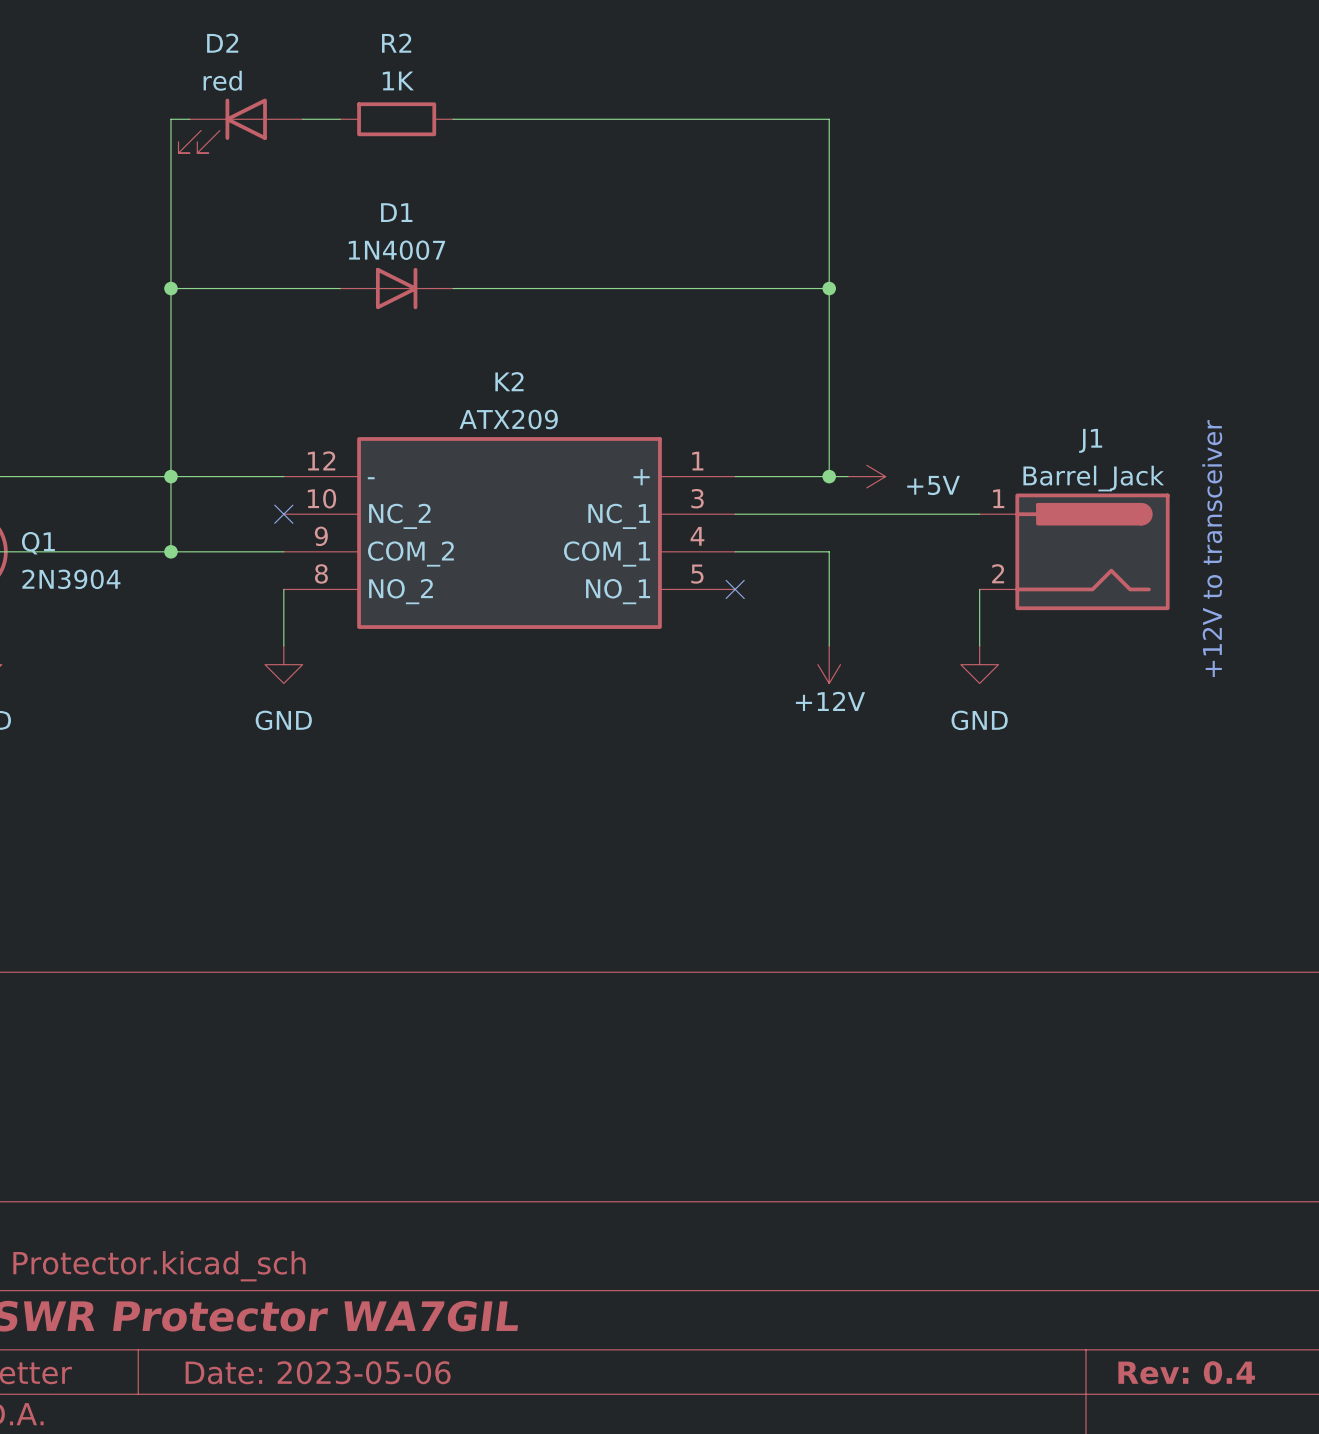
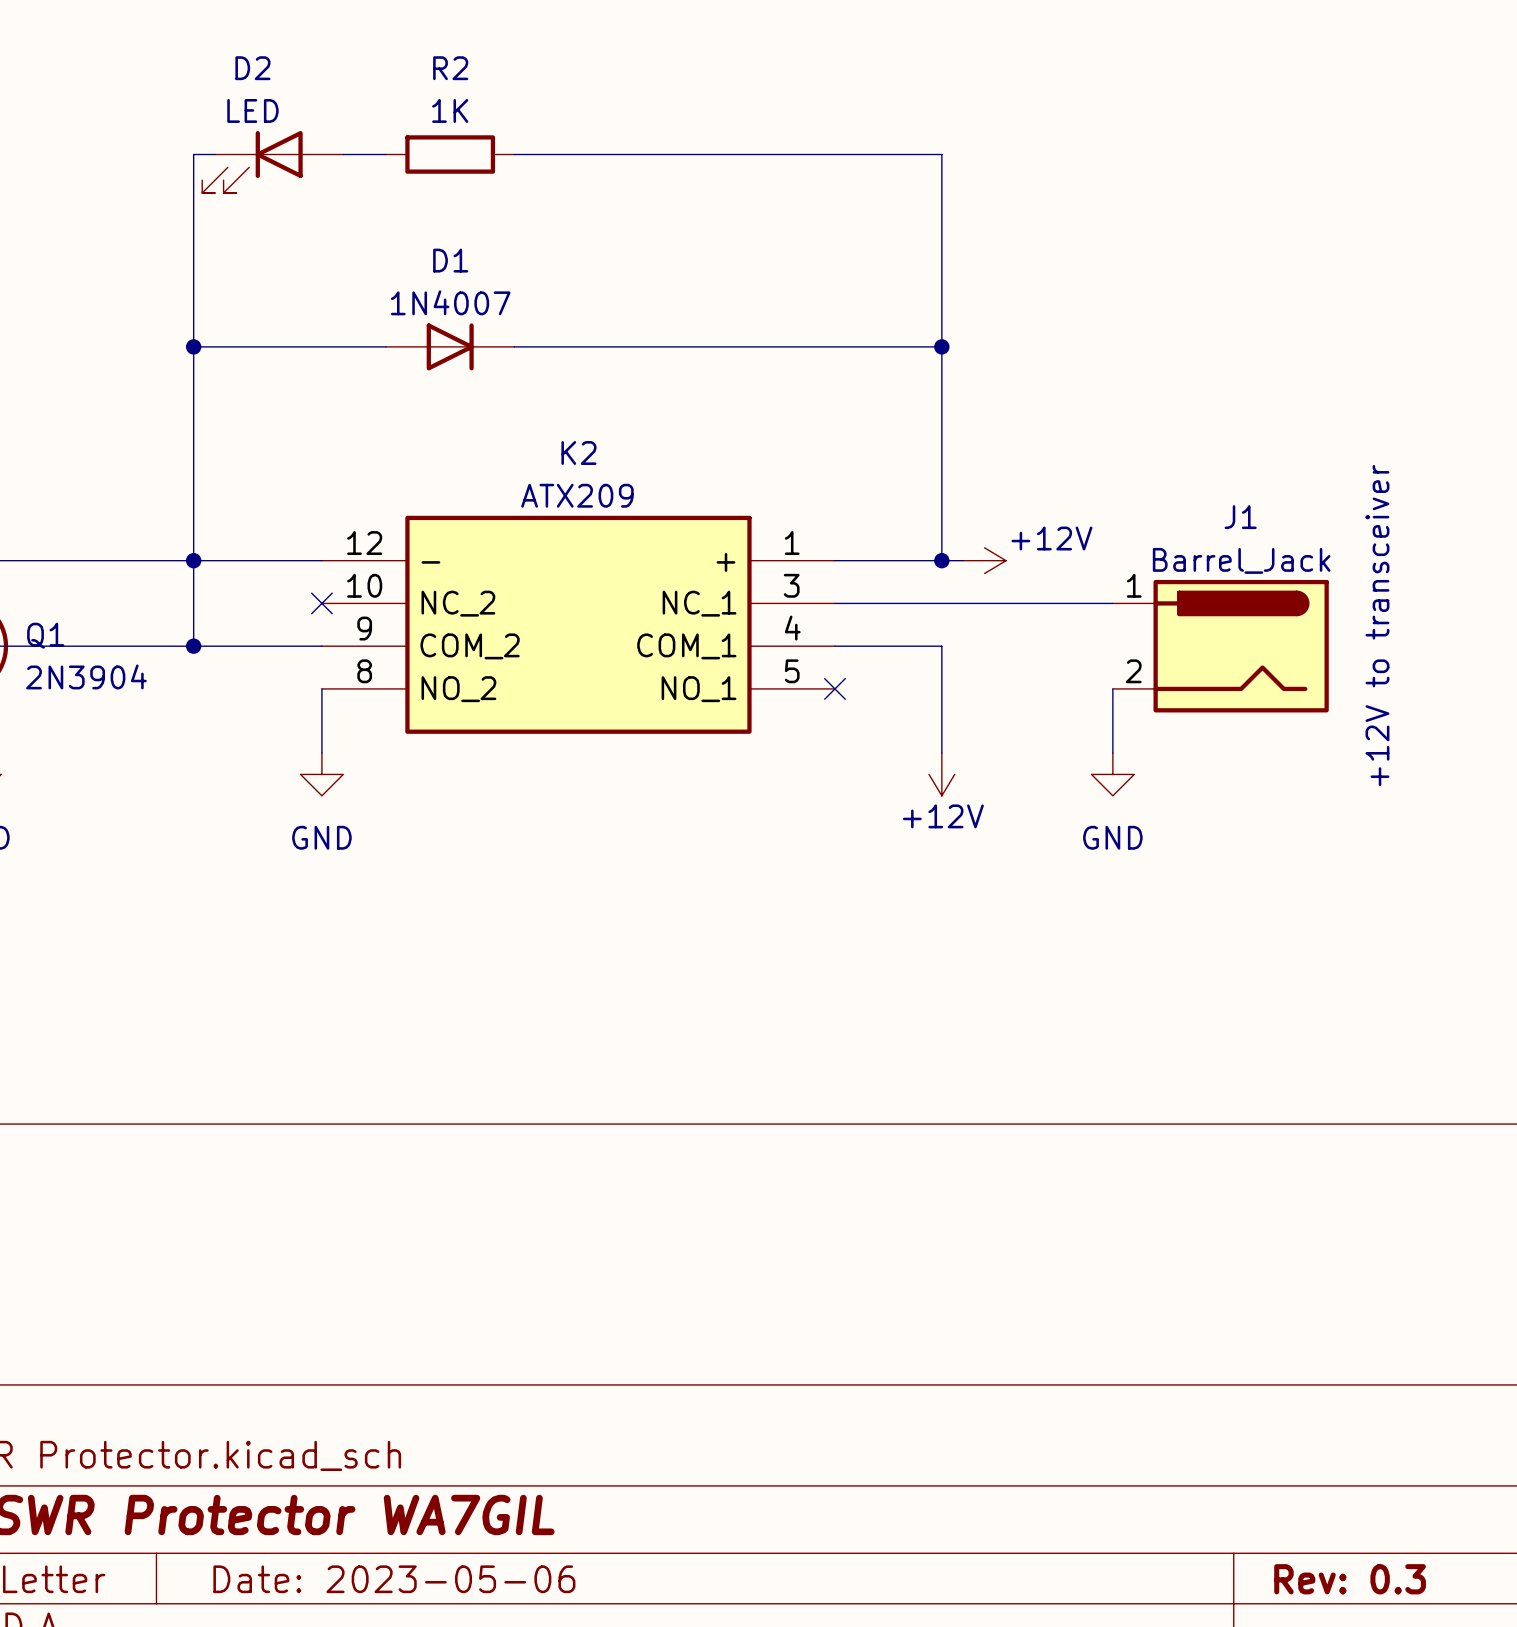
D2 value: red (222, 80) -> LED (252, 110)
power symbol: +5V (866, 476) -> +12V (984, 560)
title block: Rev: 0.4 (1186, 1372) -> Rev: 0.3 (1350, 1579)

